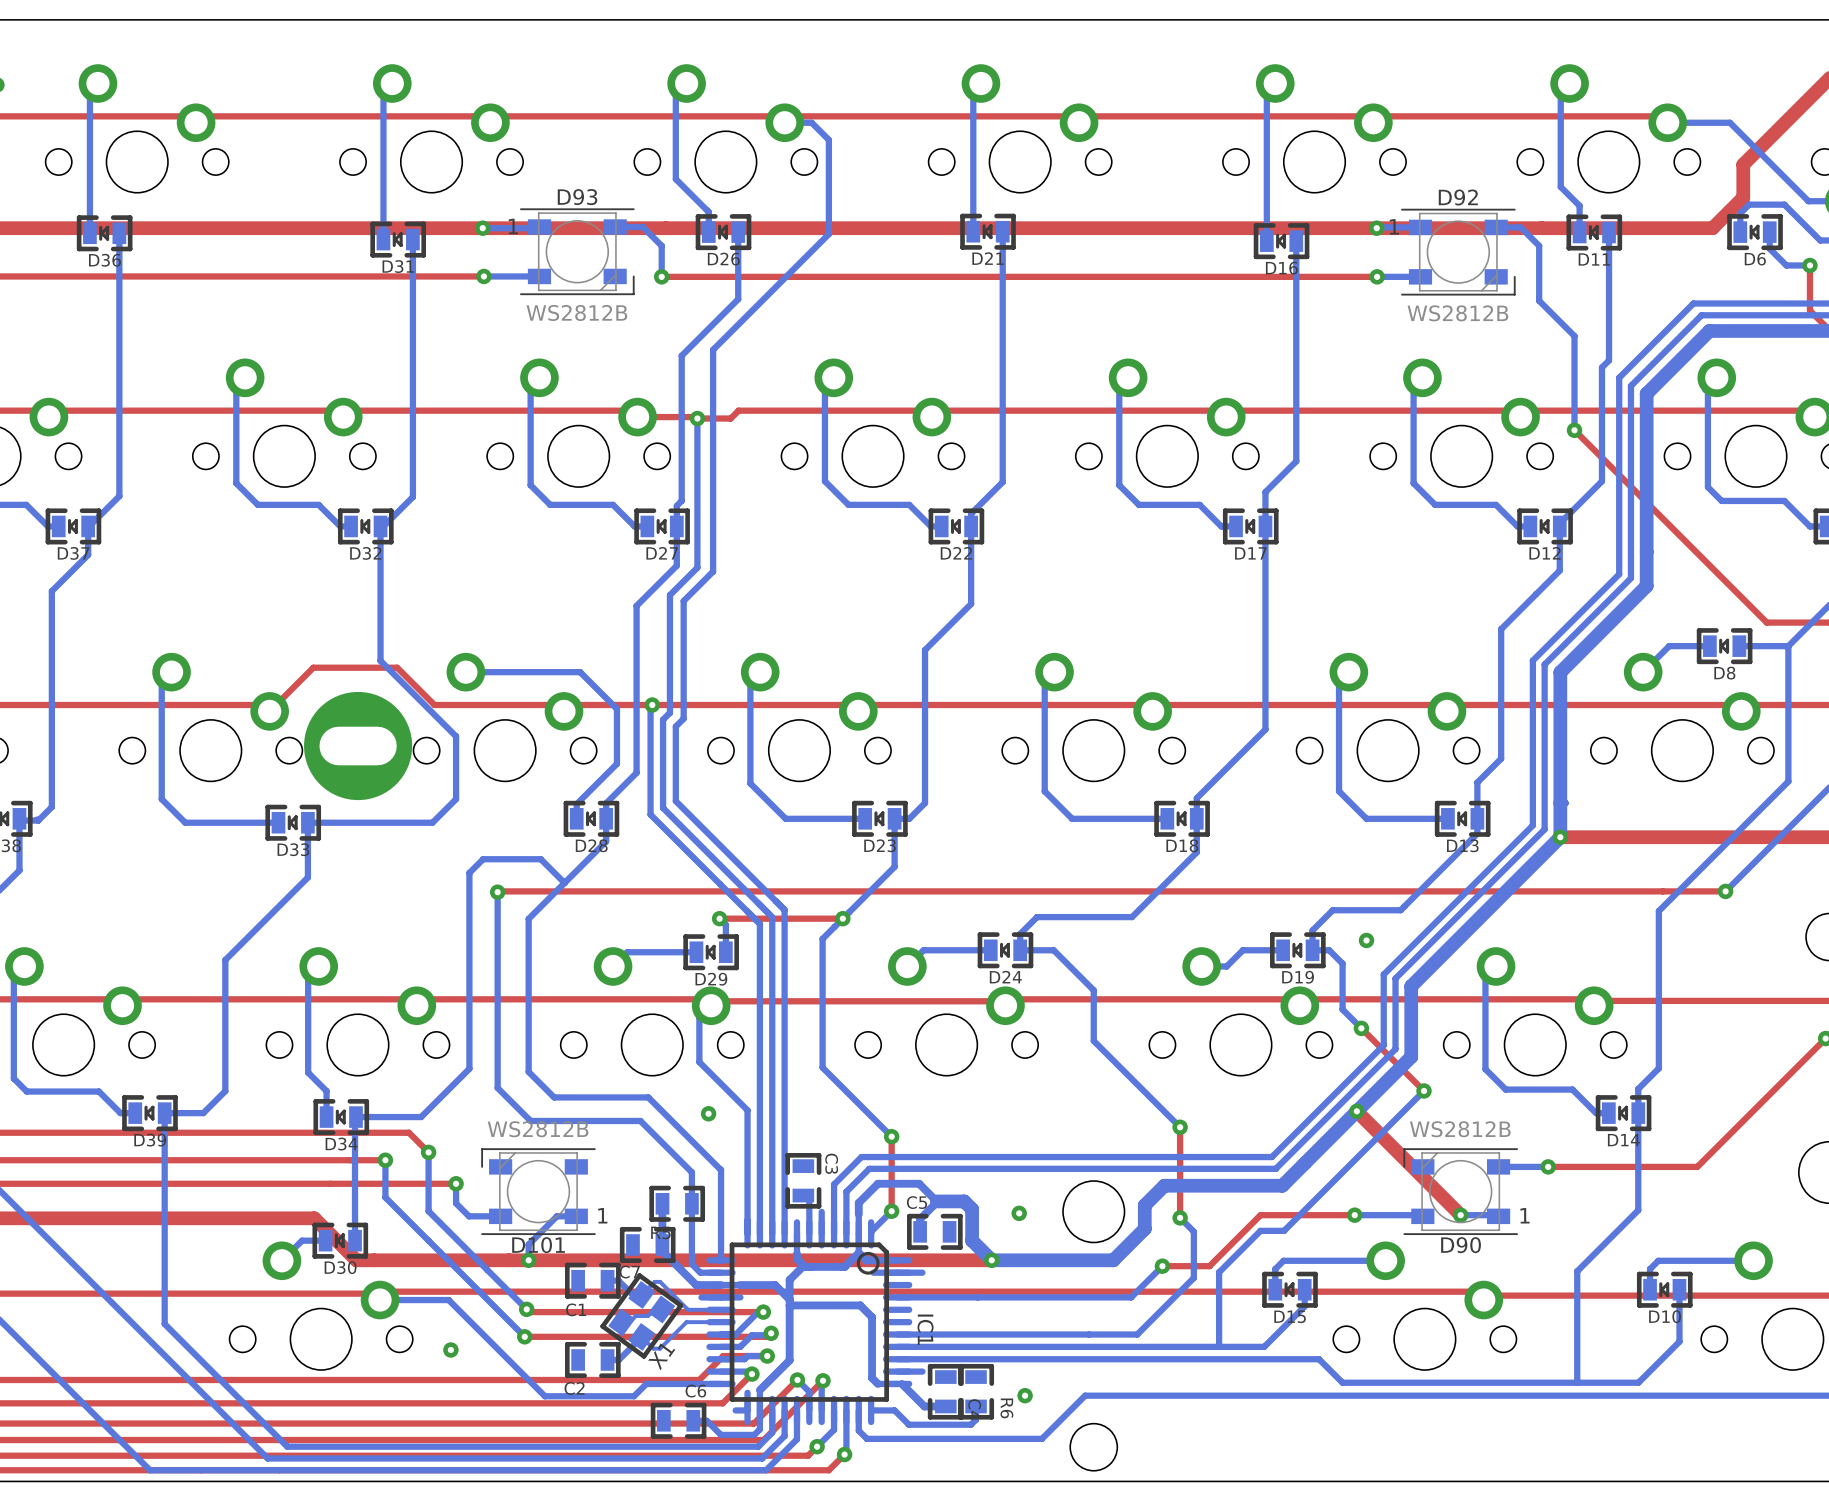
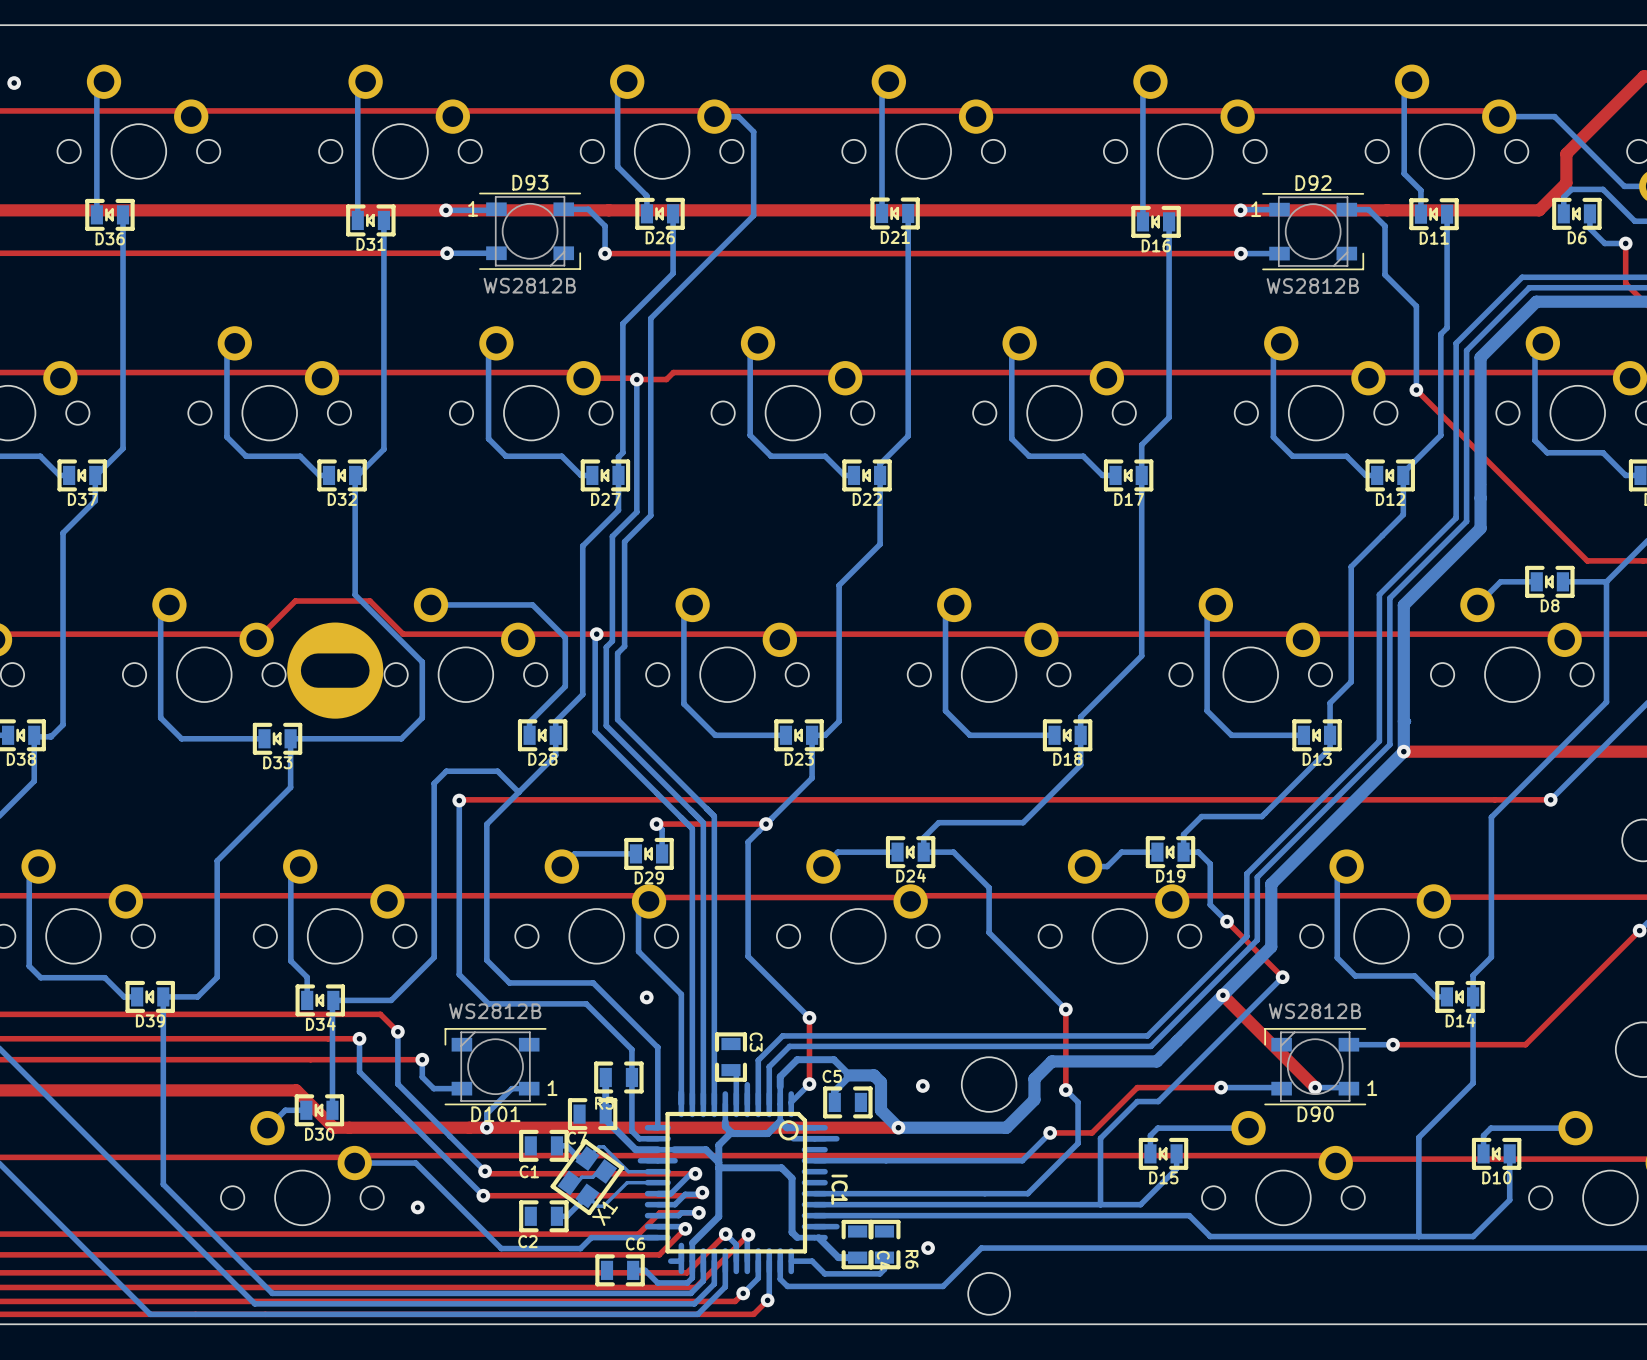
via: (1366, 940) -> none

